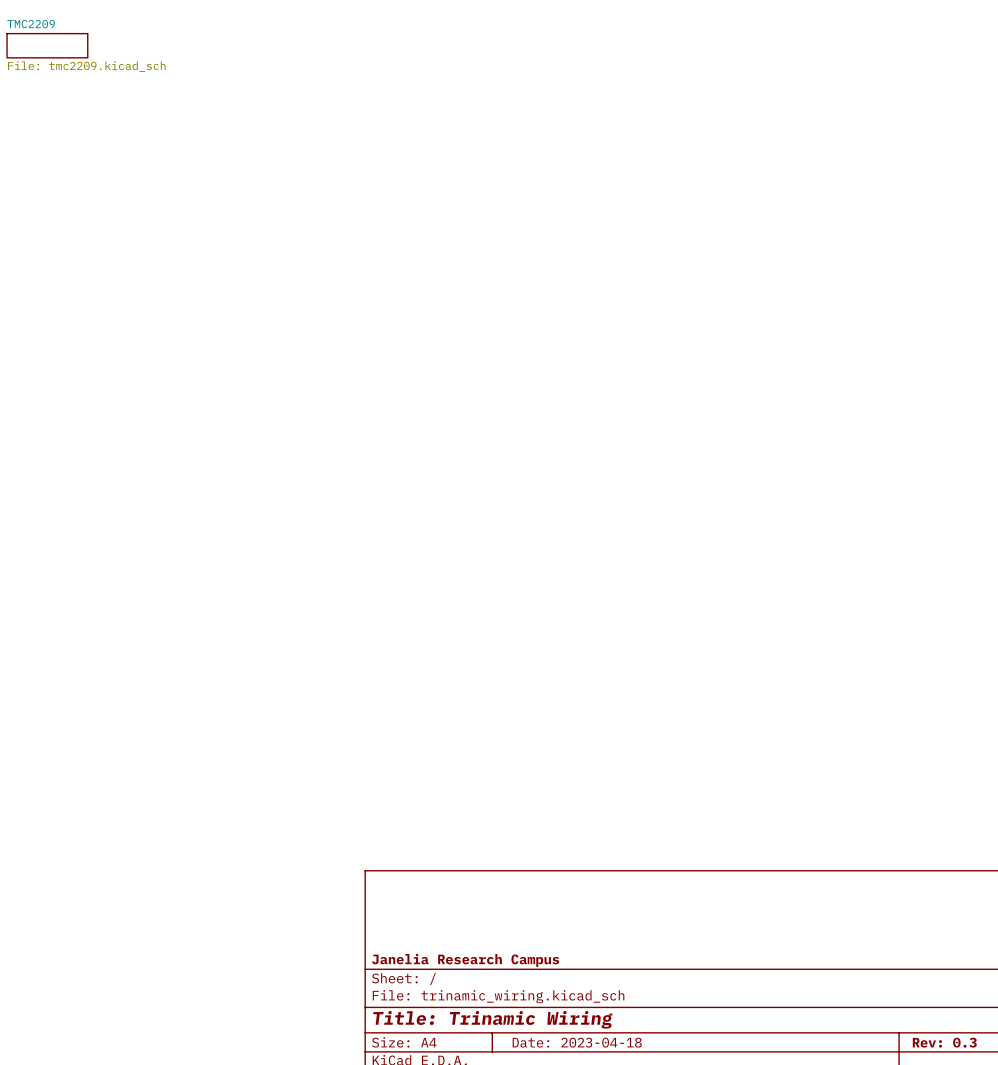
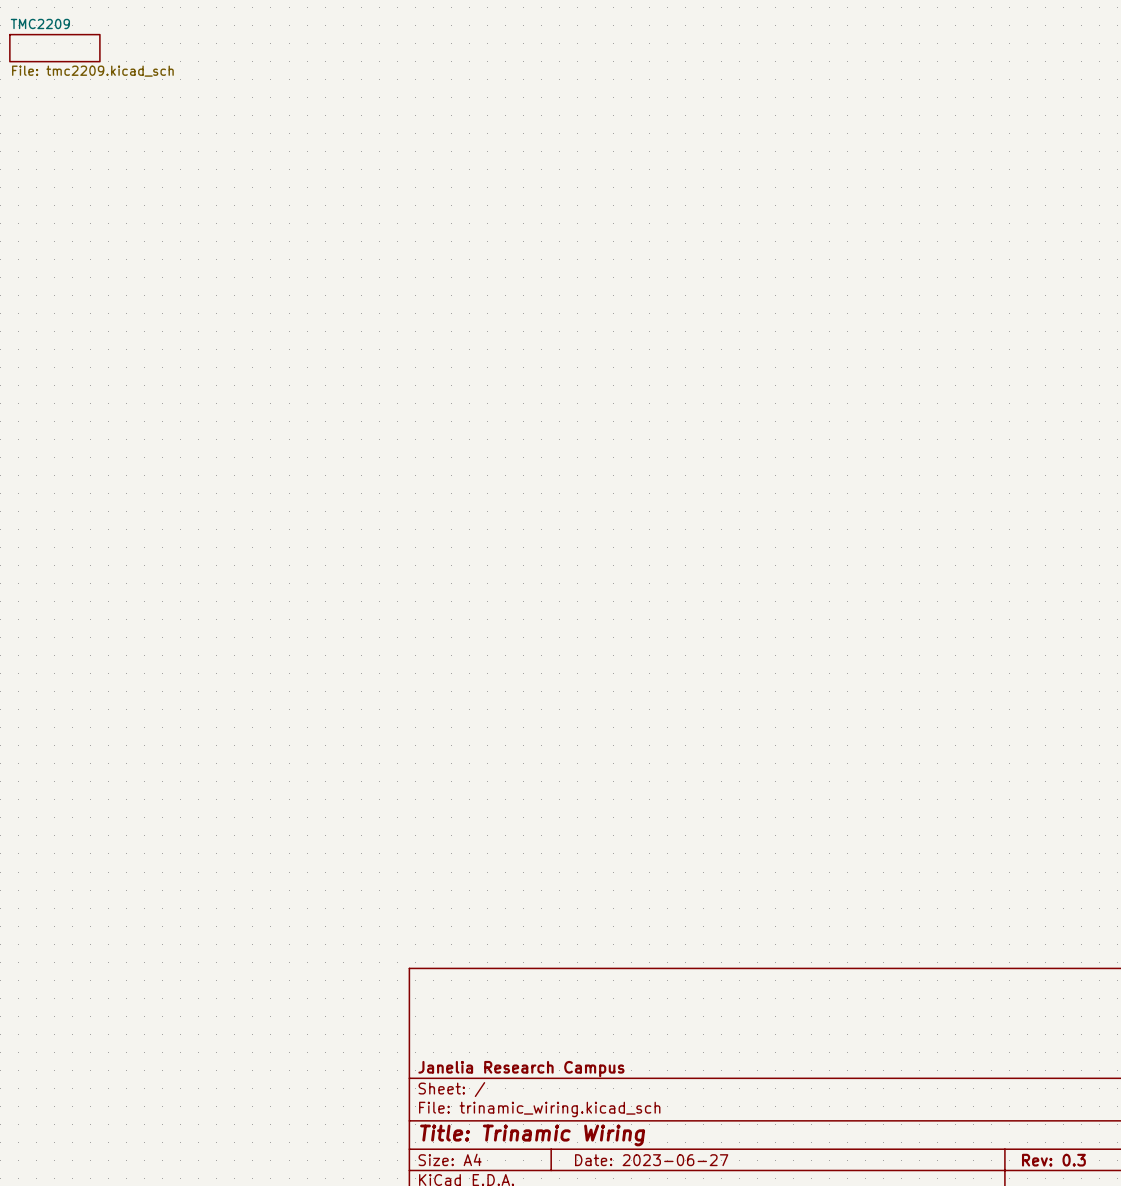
title block: Date: 2023-04-18 (577, 1042) -> Date: 2023-06-27 (651, 1160)

